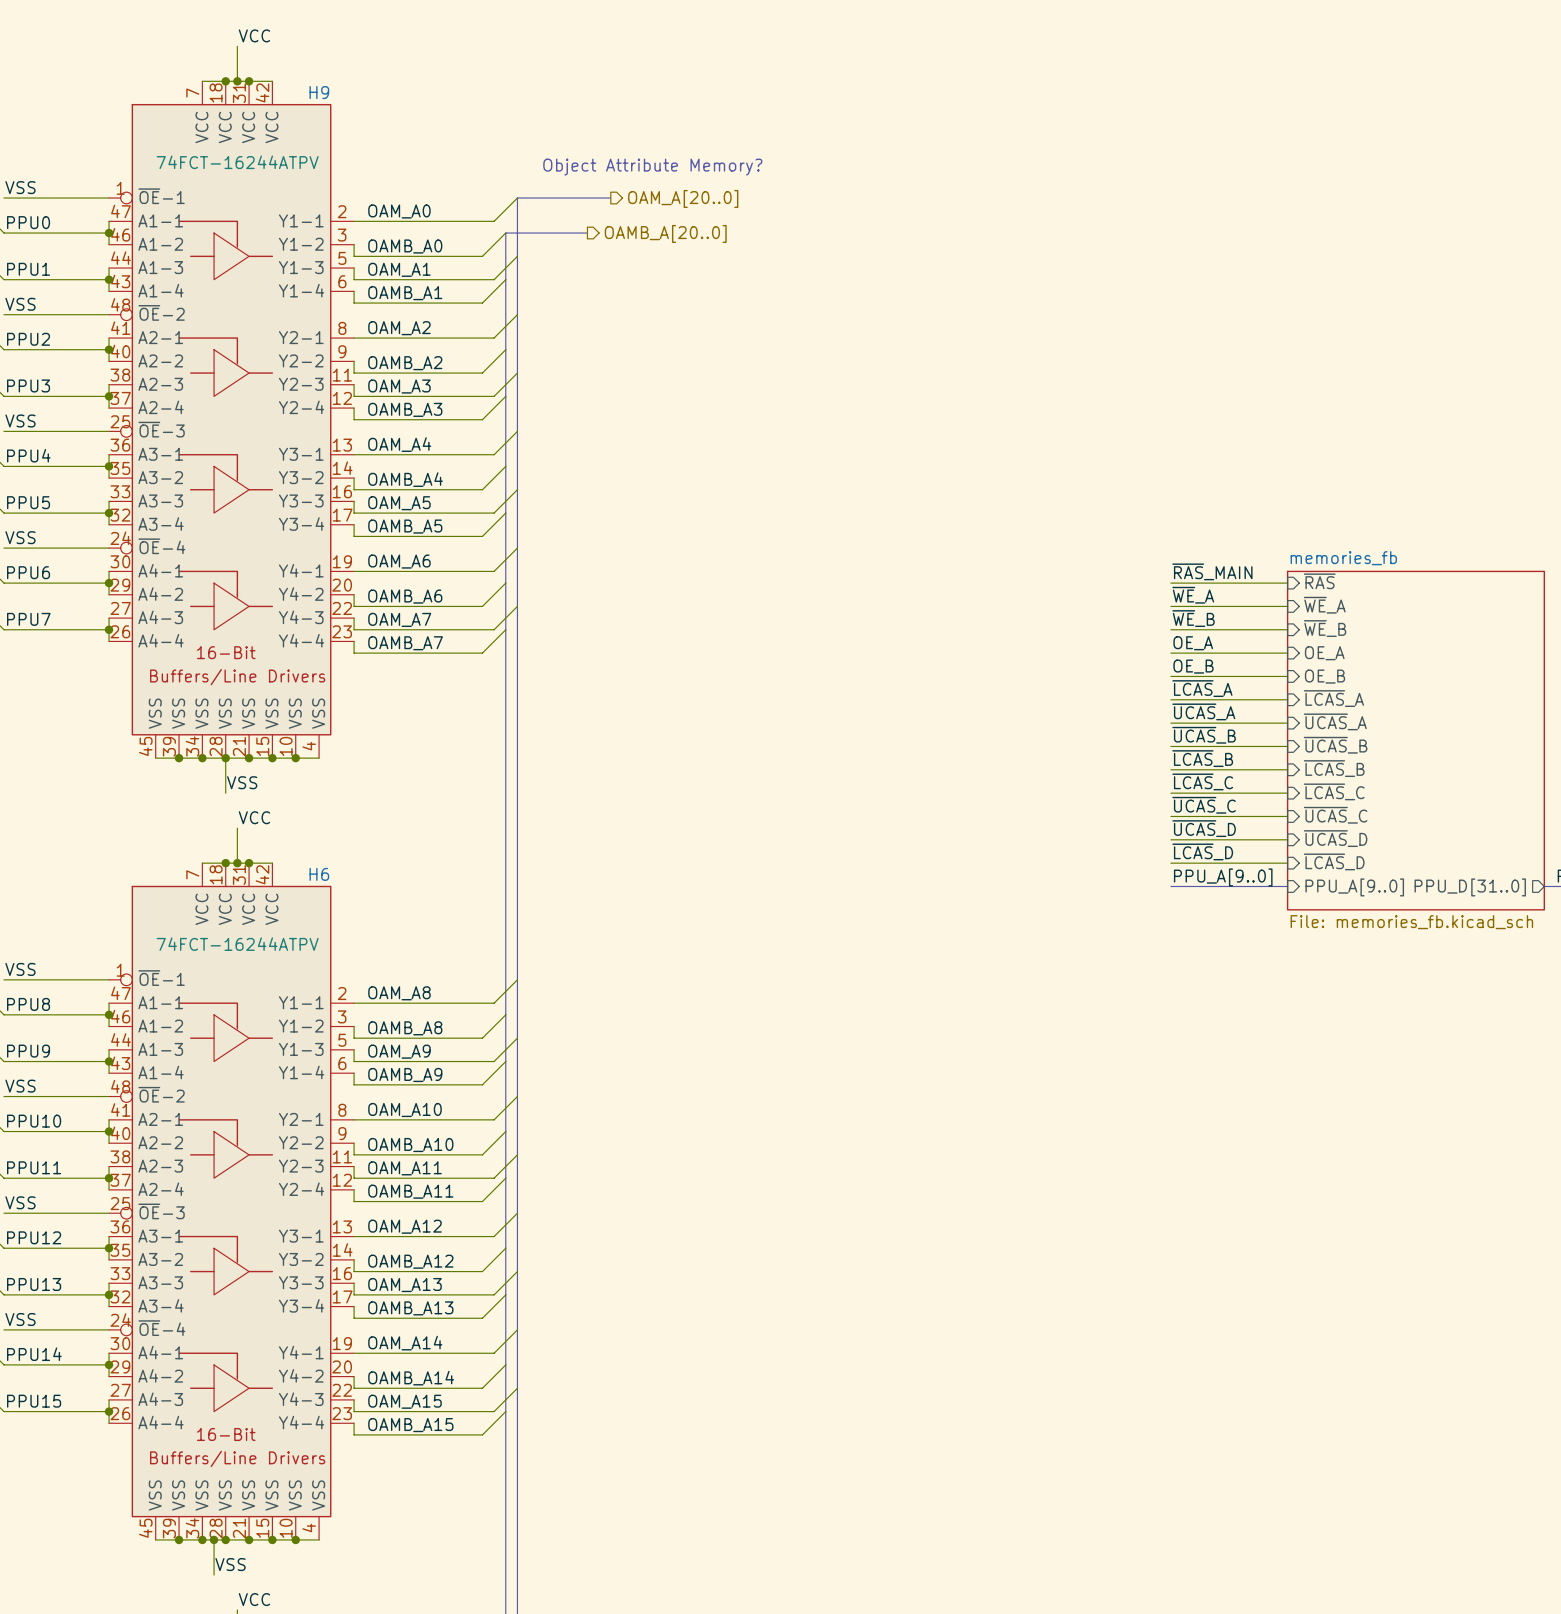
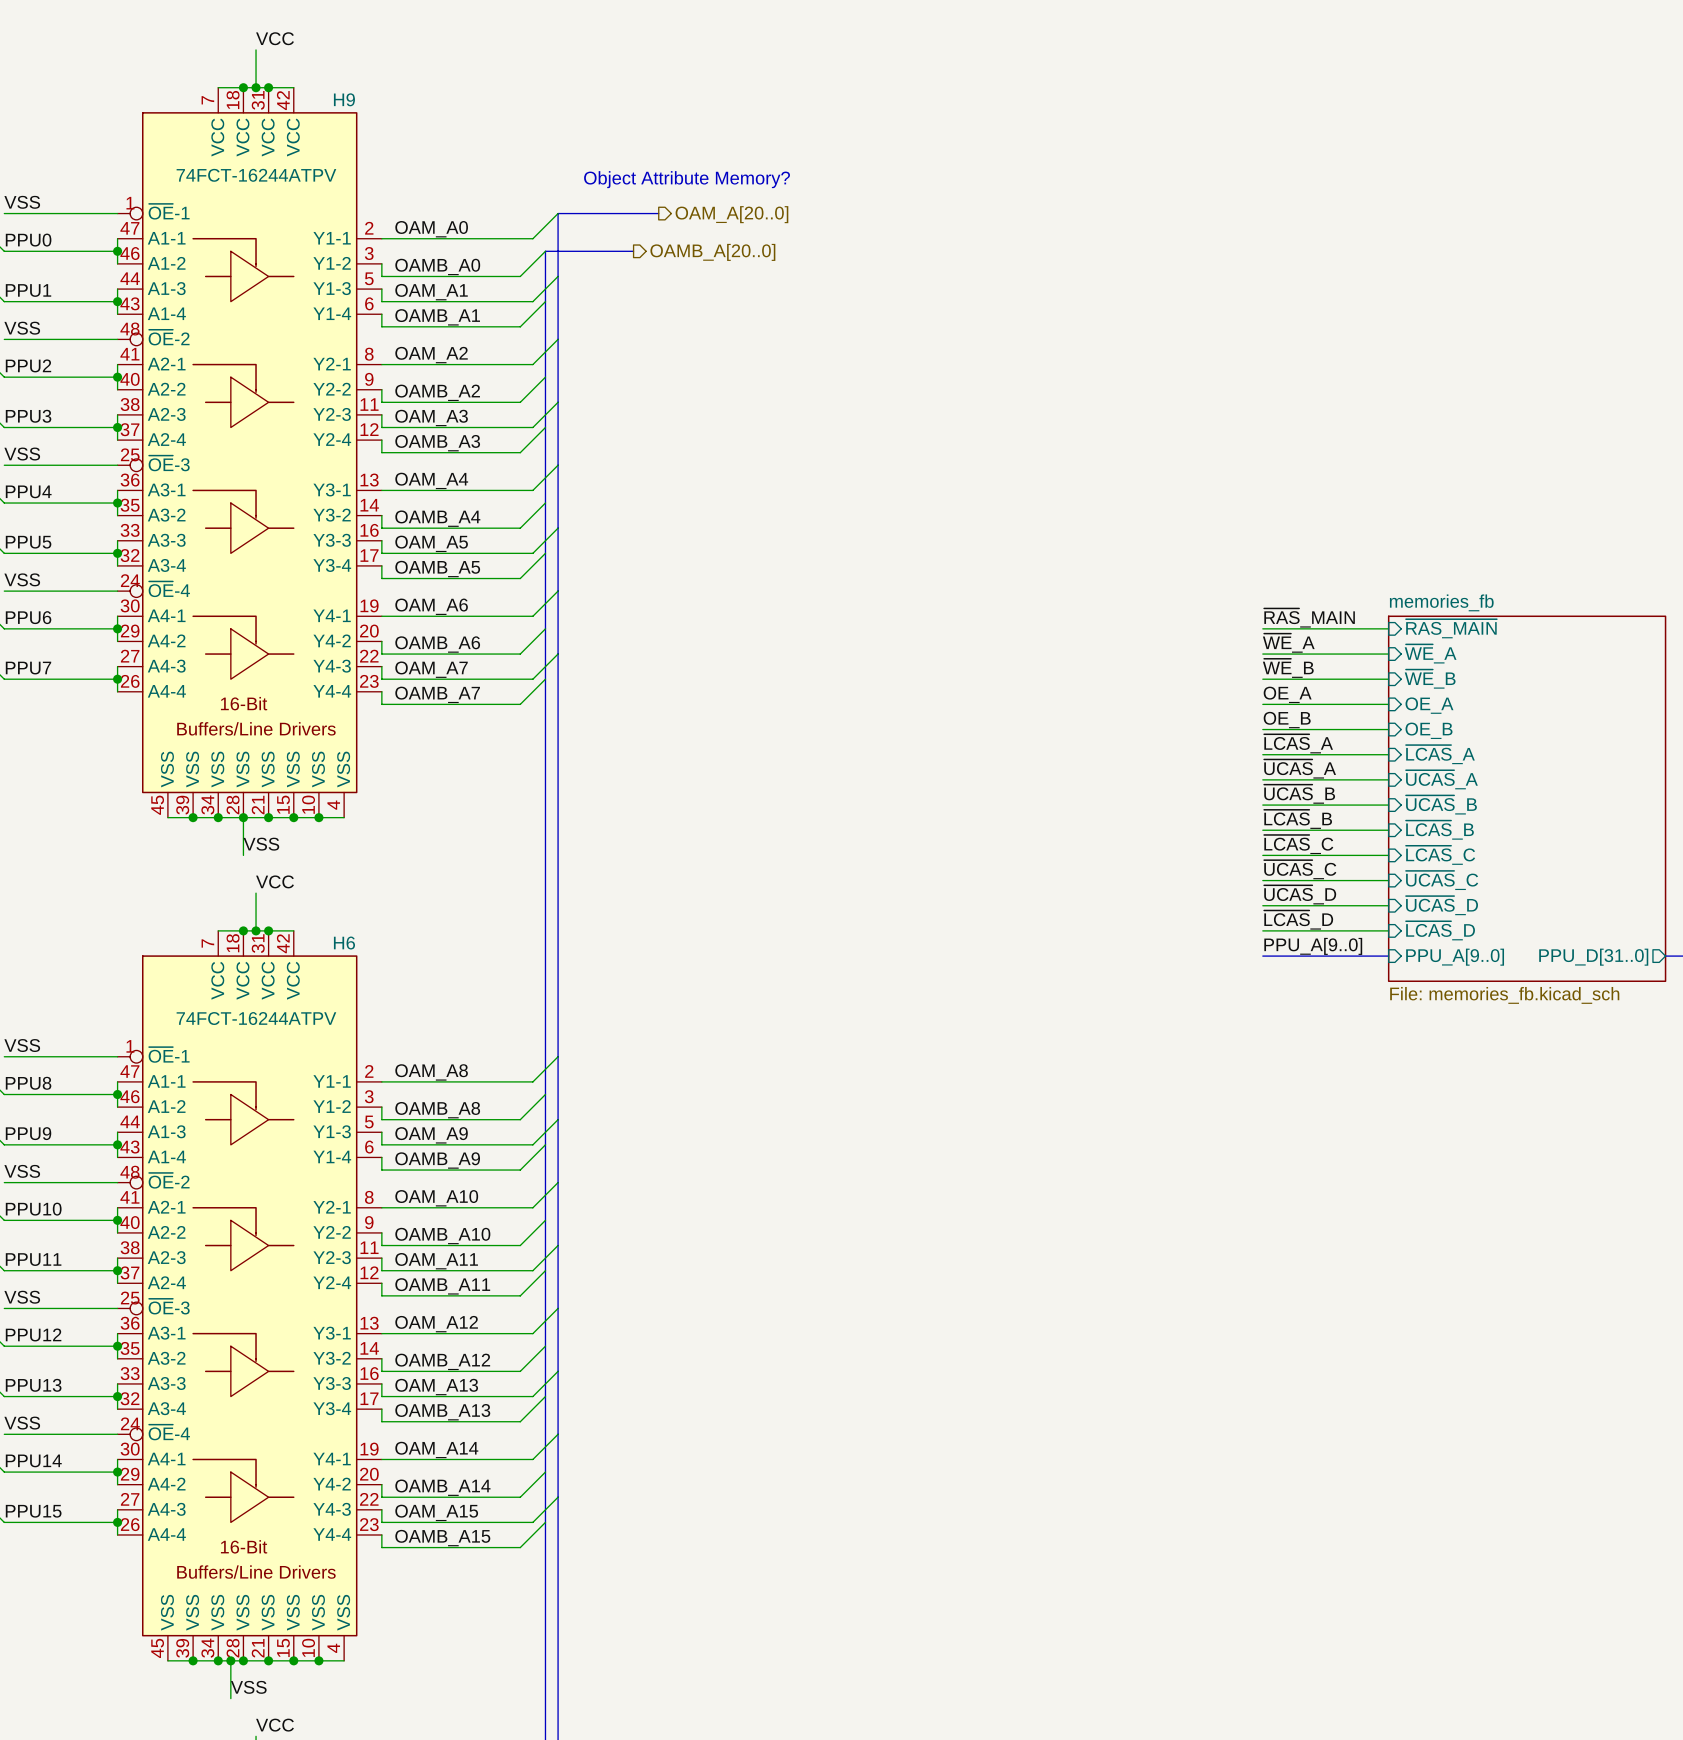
sheet pin: ~{RAS} (1319, 581) -> ~{RAS_MAIN} (1451, 628)

